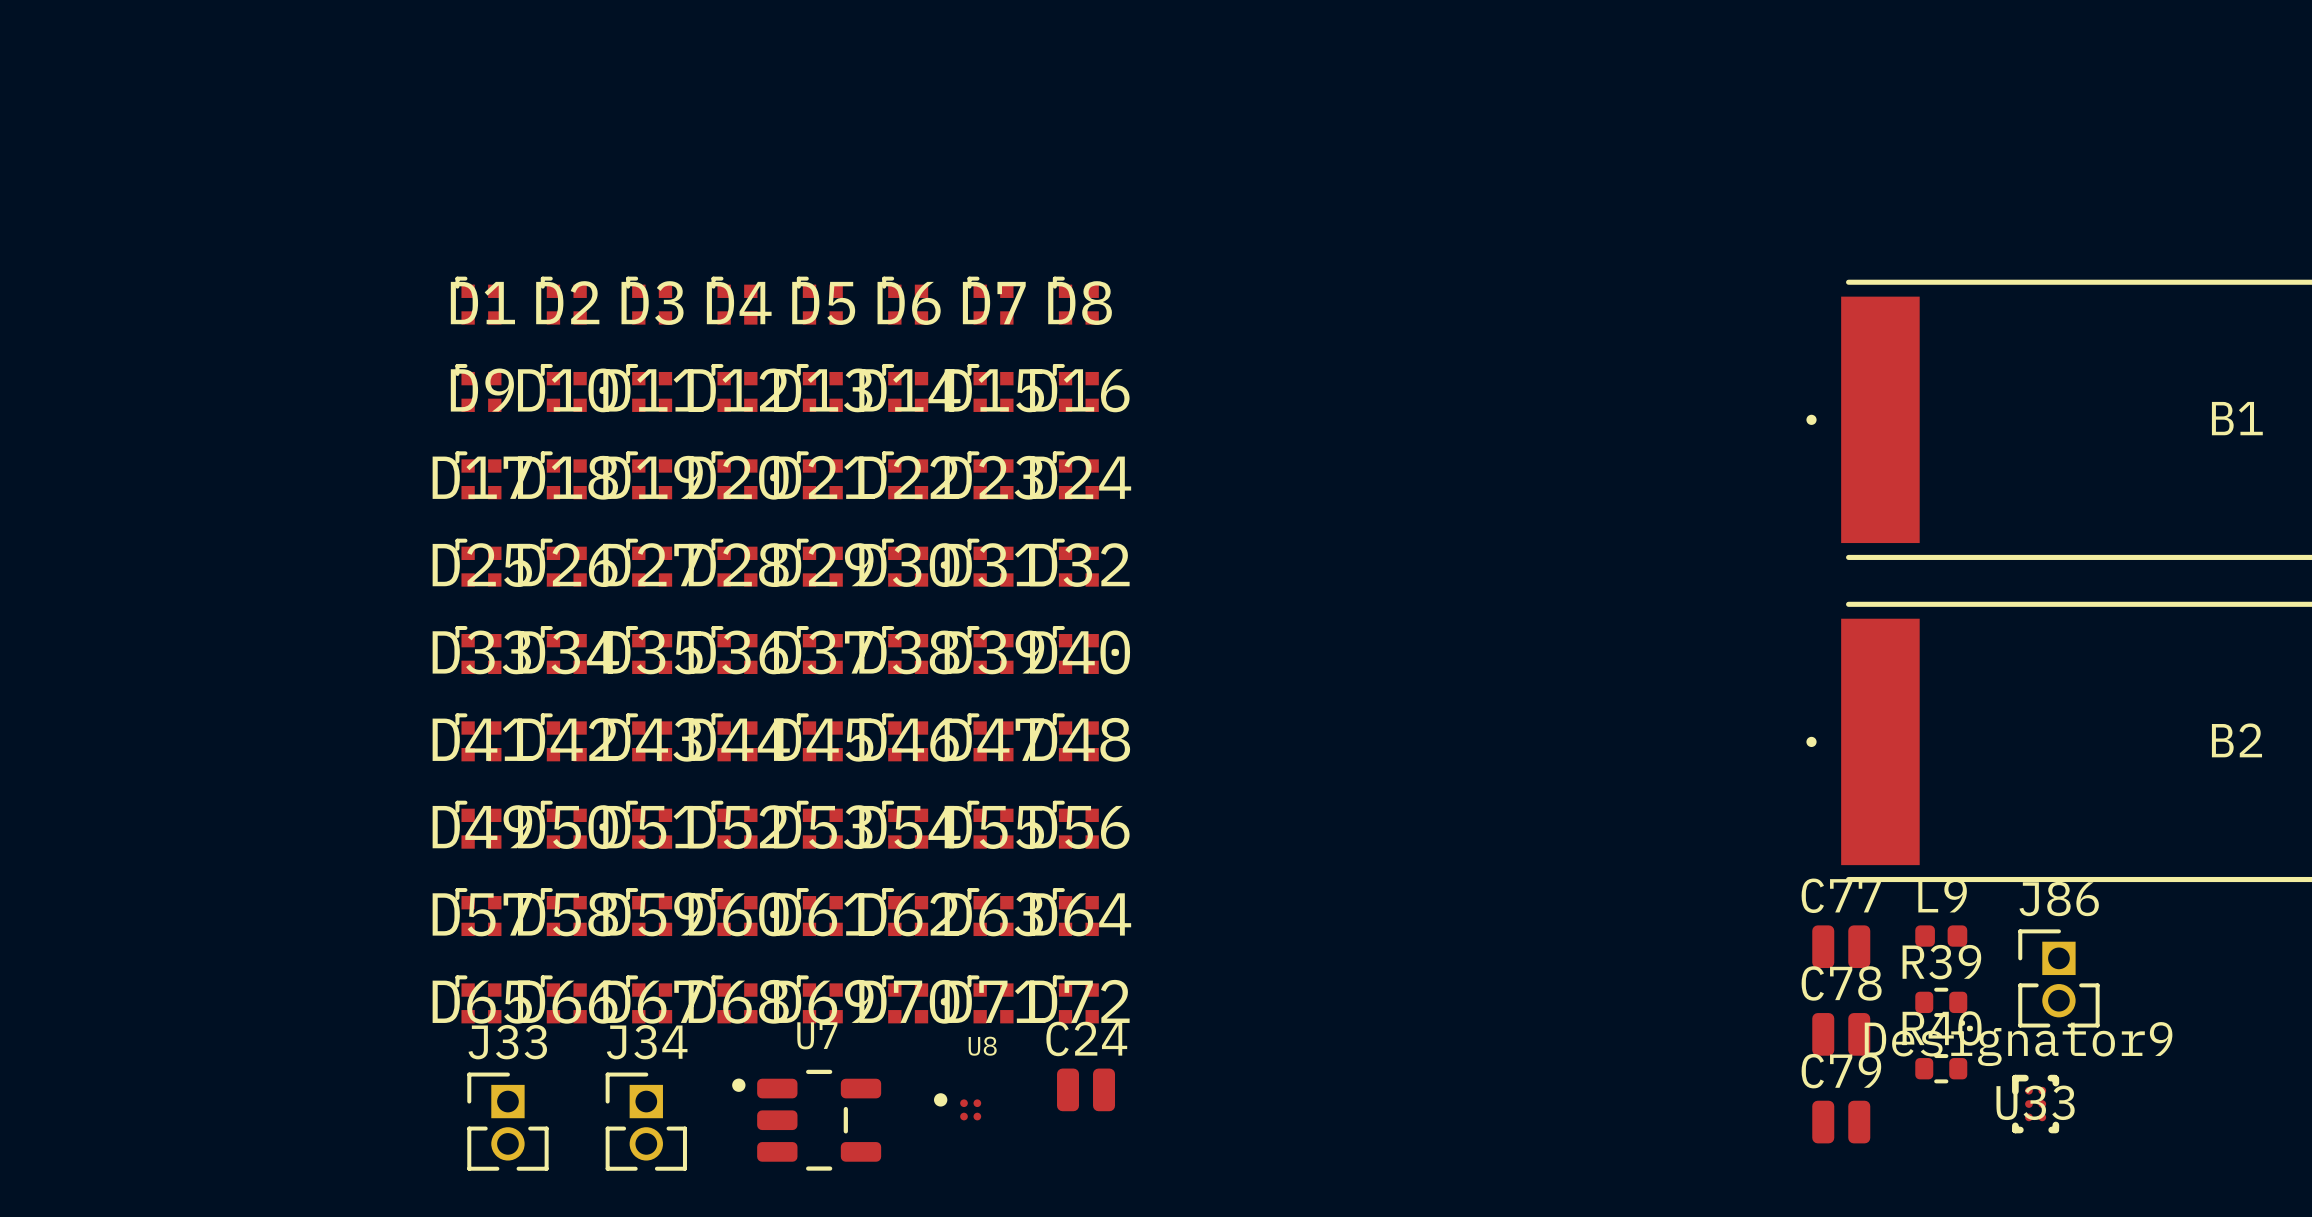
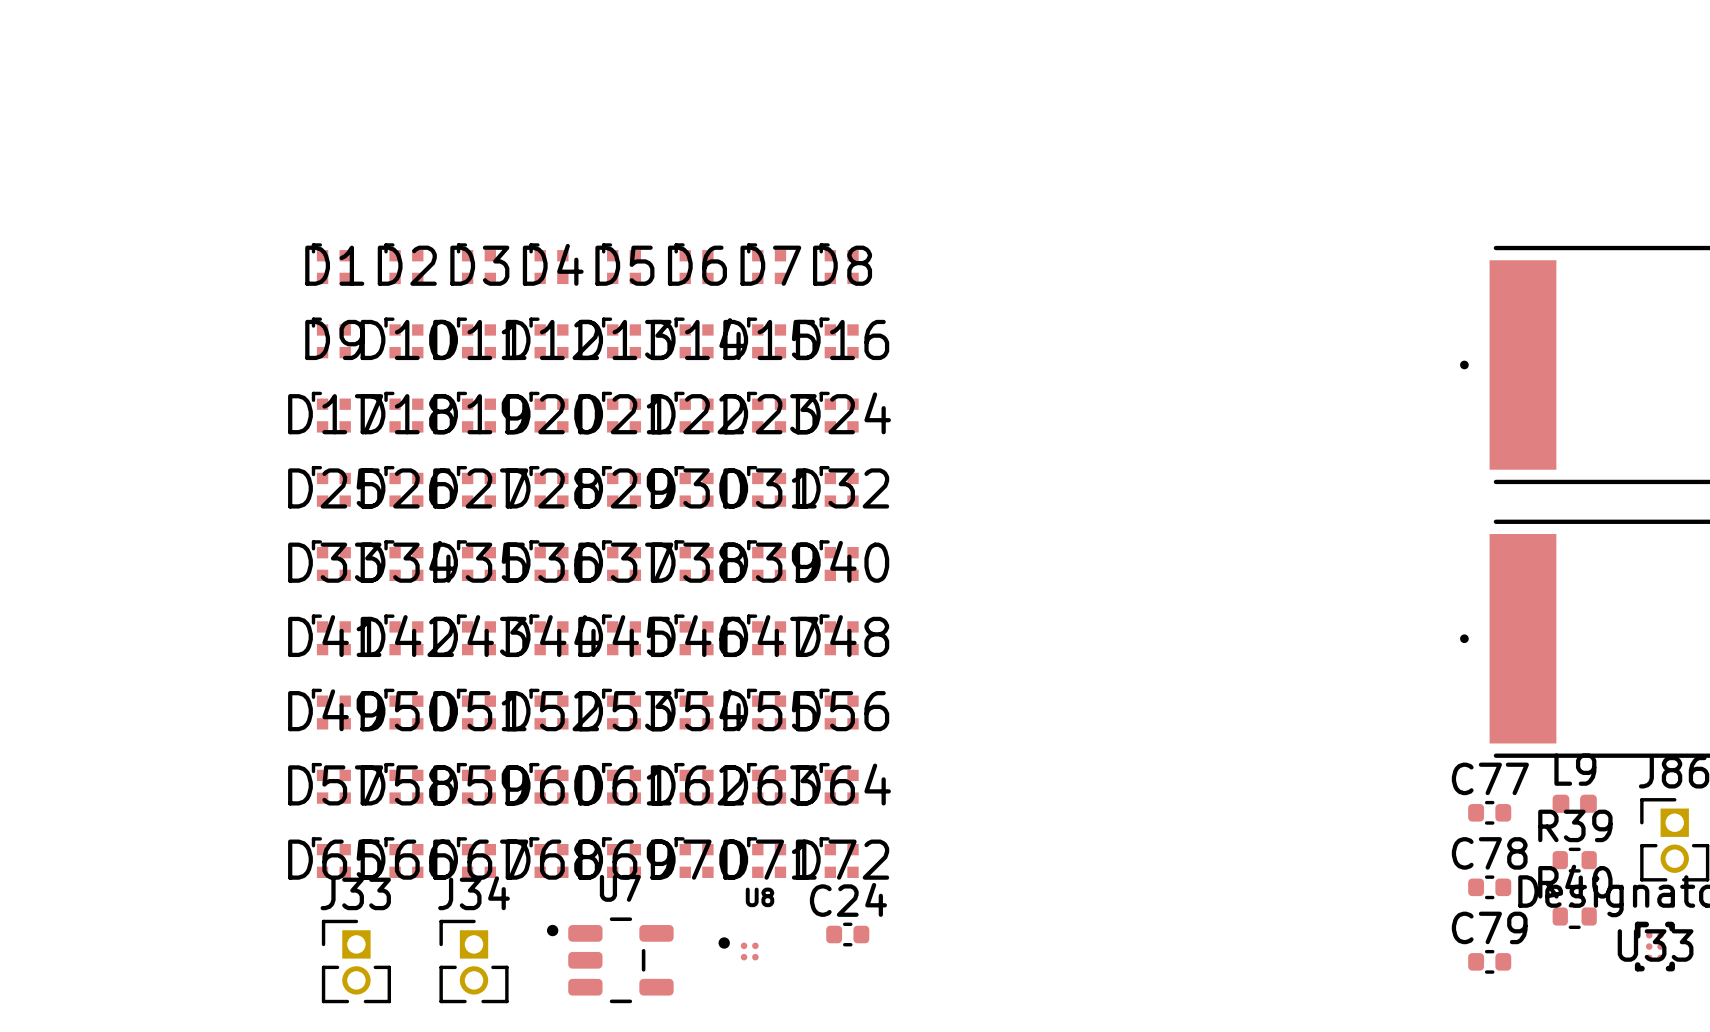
C77 footprint: [1812, 925, 1871, 969] -> [1468, 800, 1512, 825]
C78 footprint: [1812, 1013, 1871, 1056] -> [1468, 875, 1512, 900]
C24 footprint: [1057, 1068, 1116, 1112] -> [826, 922, 870, 947]
C79 footprint: [1812, 1100, 1871, 1144] -> [1468, 949, 1512, 974]

